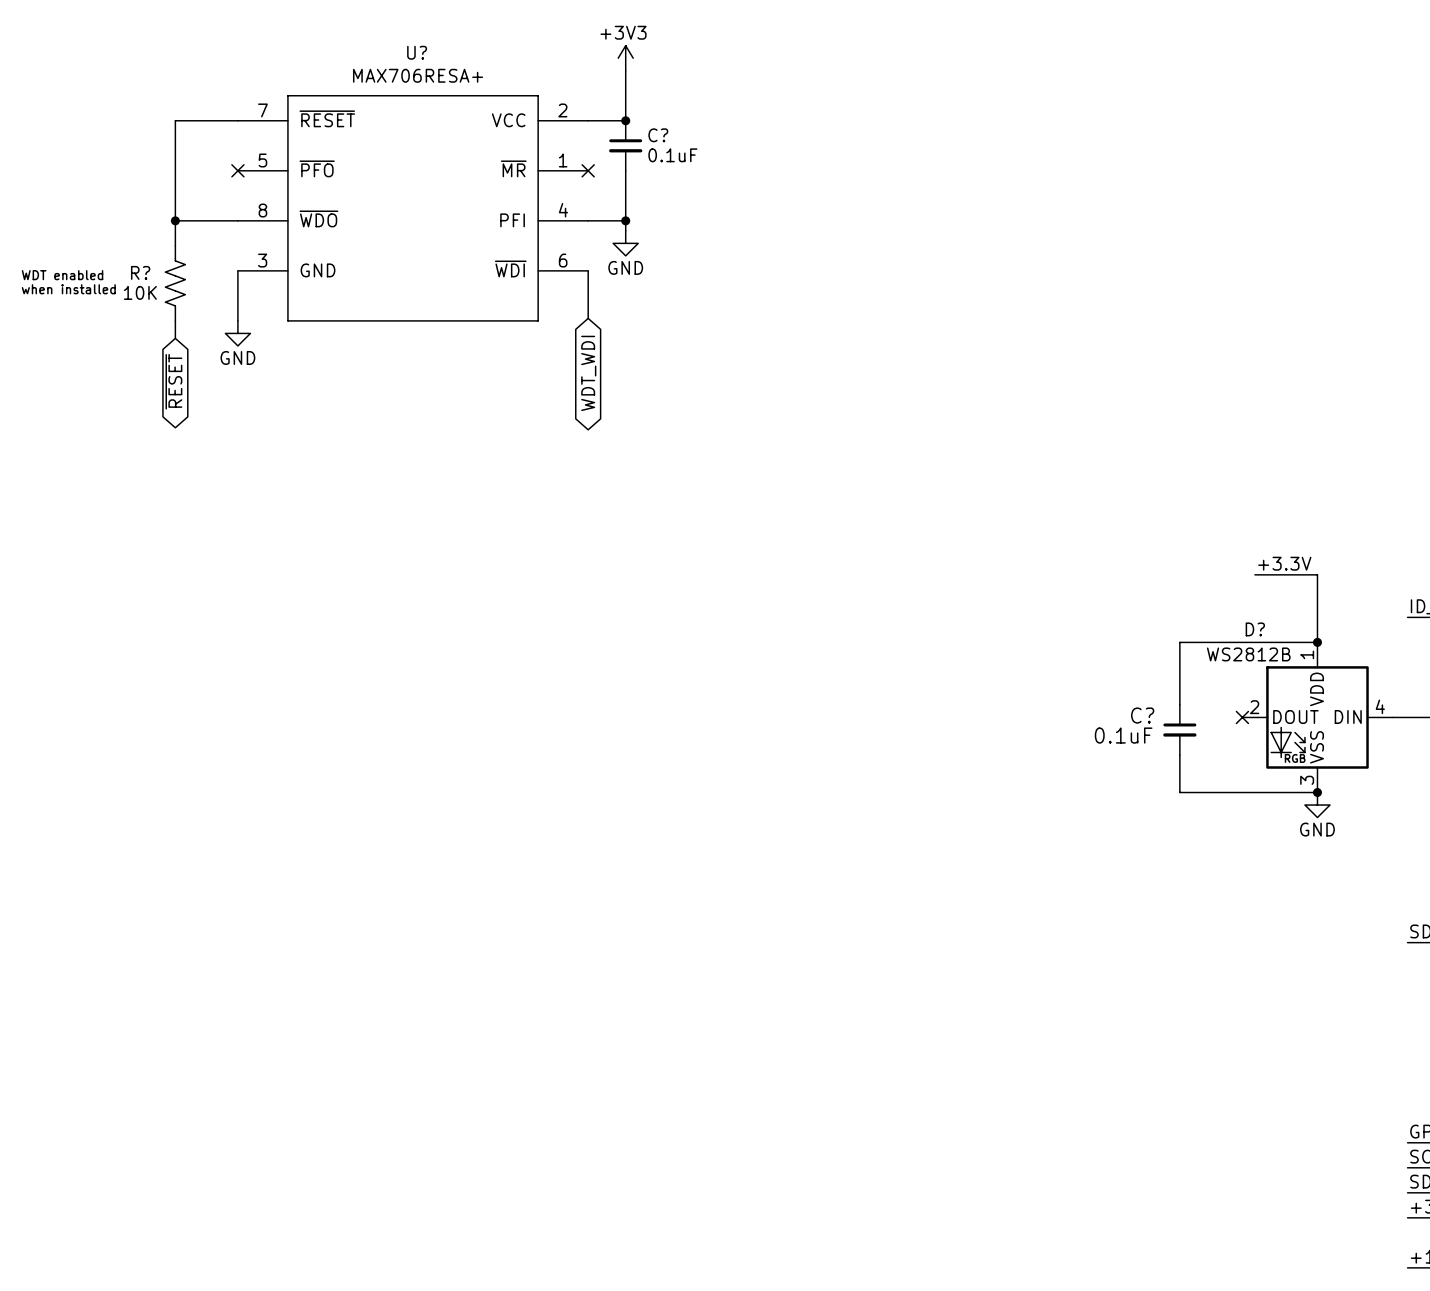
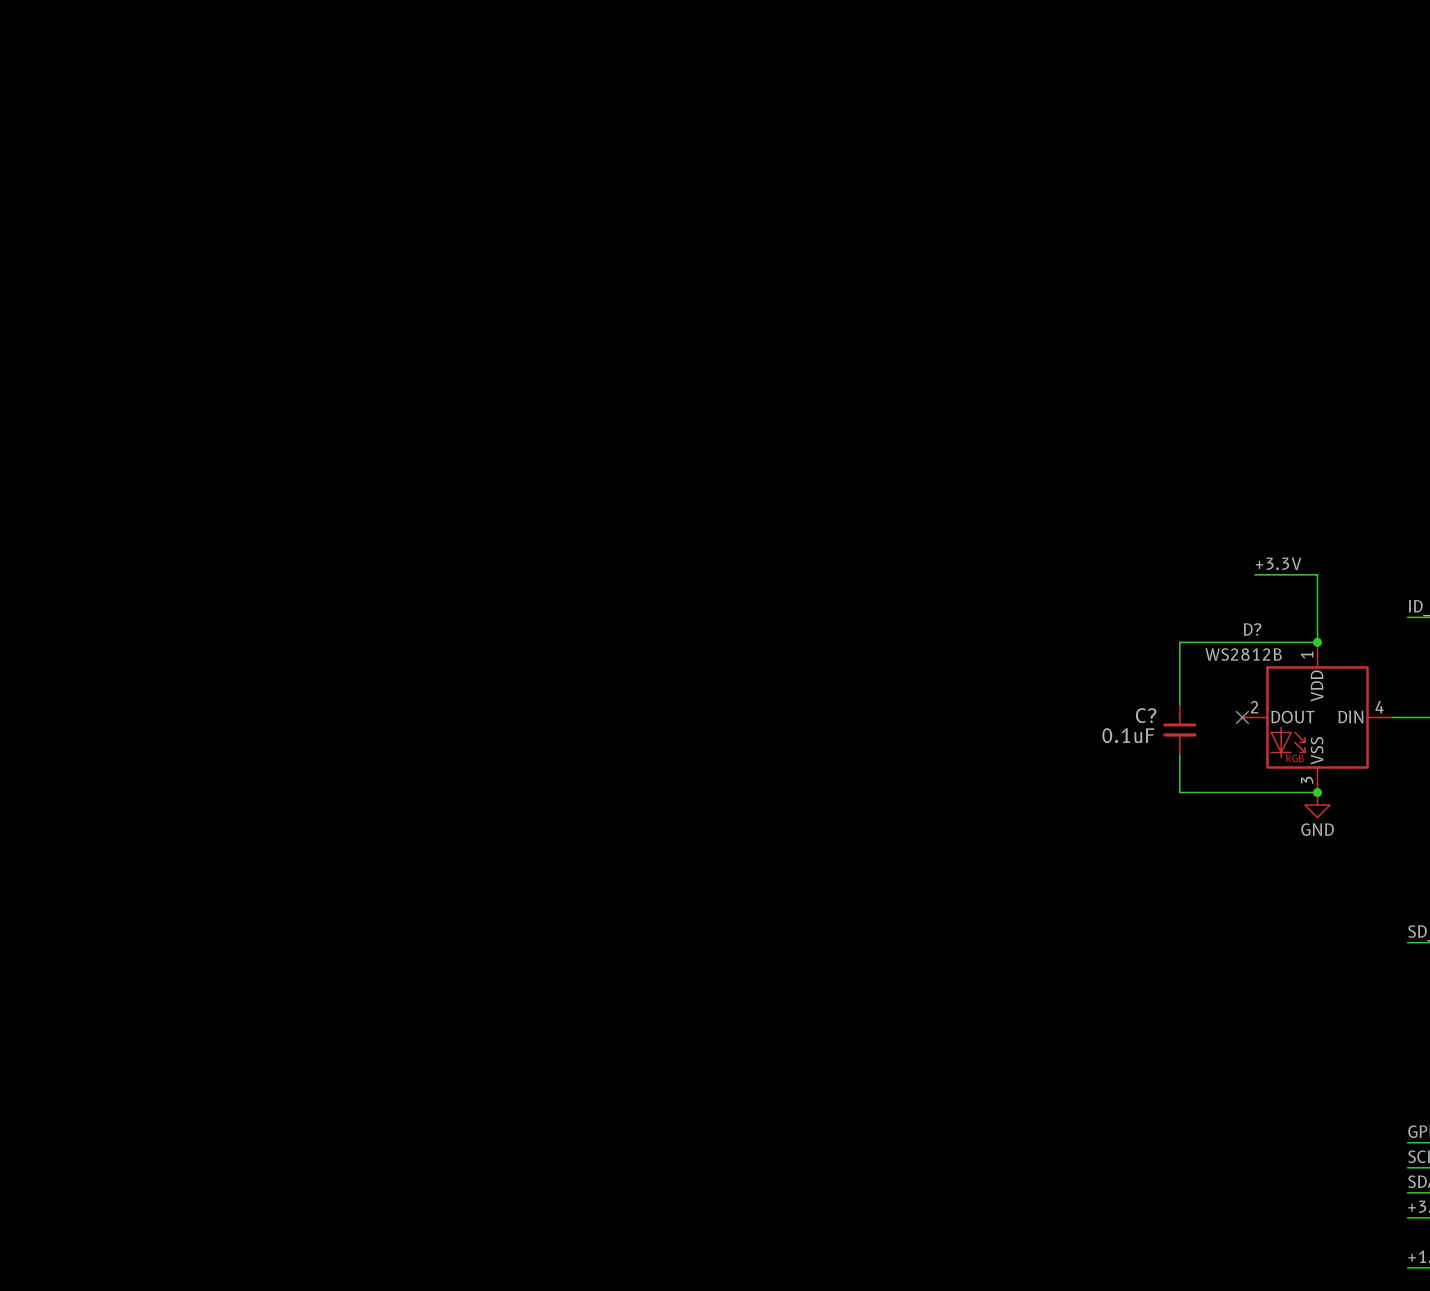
power symbol: +3V3 (625, 58) -> none
wire: (625, 70) (625, 120) (588, 120) -> none
wire: (237, 120) (175, 120) (175, 245) -> none
junction: (625, 120) -> none
C?: 0.1uF (625, 145) -> none
no-connect mark: (237, 170) -> none
no-connect mark: (588, 170) -> none
wire: (625, 170) (625, 230) -> none
U?: MAX706RESA+ (413, 208) -> none
wire: (175, 220) (237, 220) -> none
junction: (175, 220) -> none
wire: (588, 220) (625, 220) -> none
junction: (625, 220) -> none
power symbol: GND (625, 243) -> none
wire: (237, 270) (237, 320) -> none
wire: (588, 270) (588, 318) -> none
text: WDT enabled (62, 275) -> none
R?: 10K (175, 283) -> none
text: when installed (68, 289) -> none
wire: (175, 320) (175, 338) -> none
power symbol: GND (237, 333) -> none
global label: WDT_WDI (588, 373) -> none
global label: ~{RESET} (173, 381) -> none

